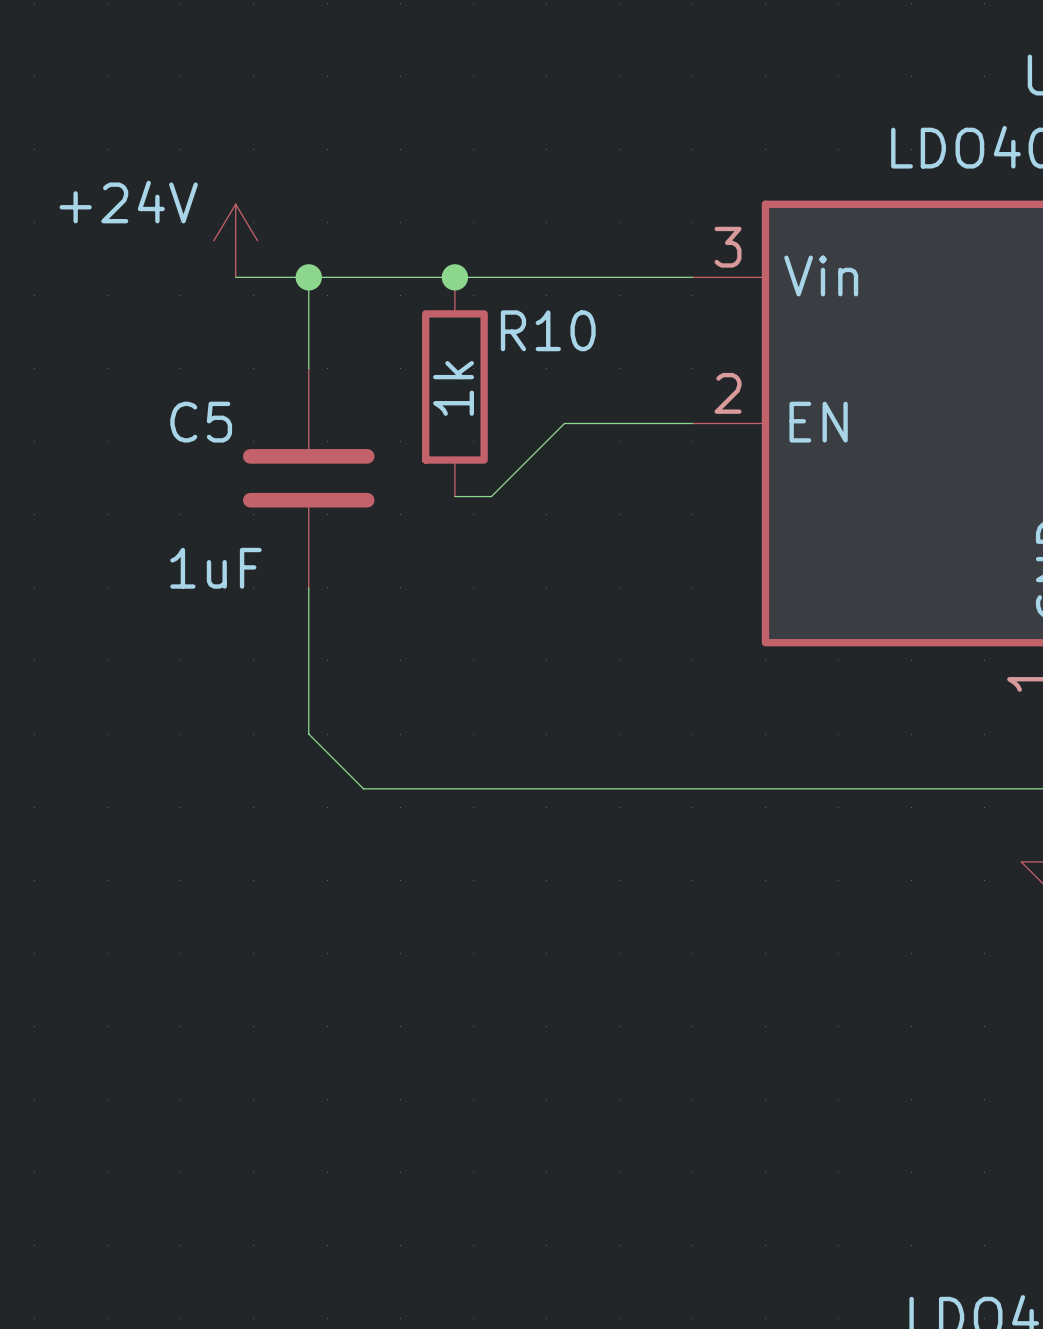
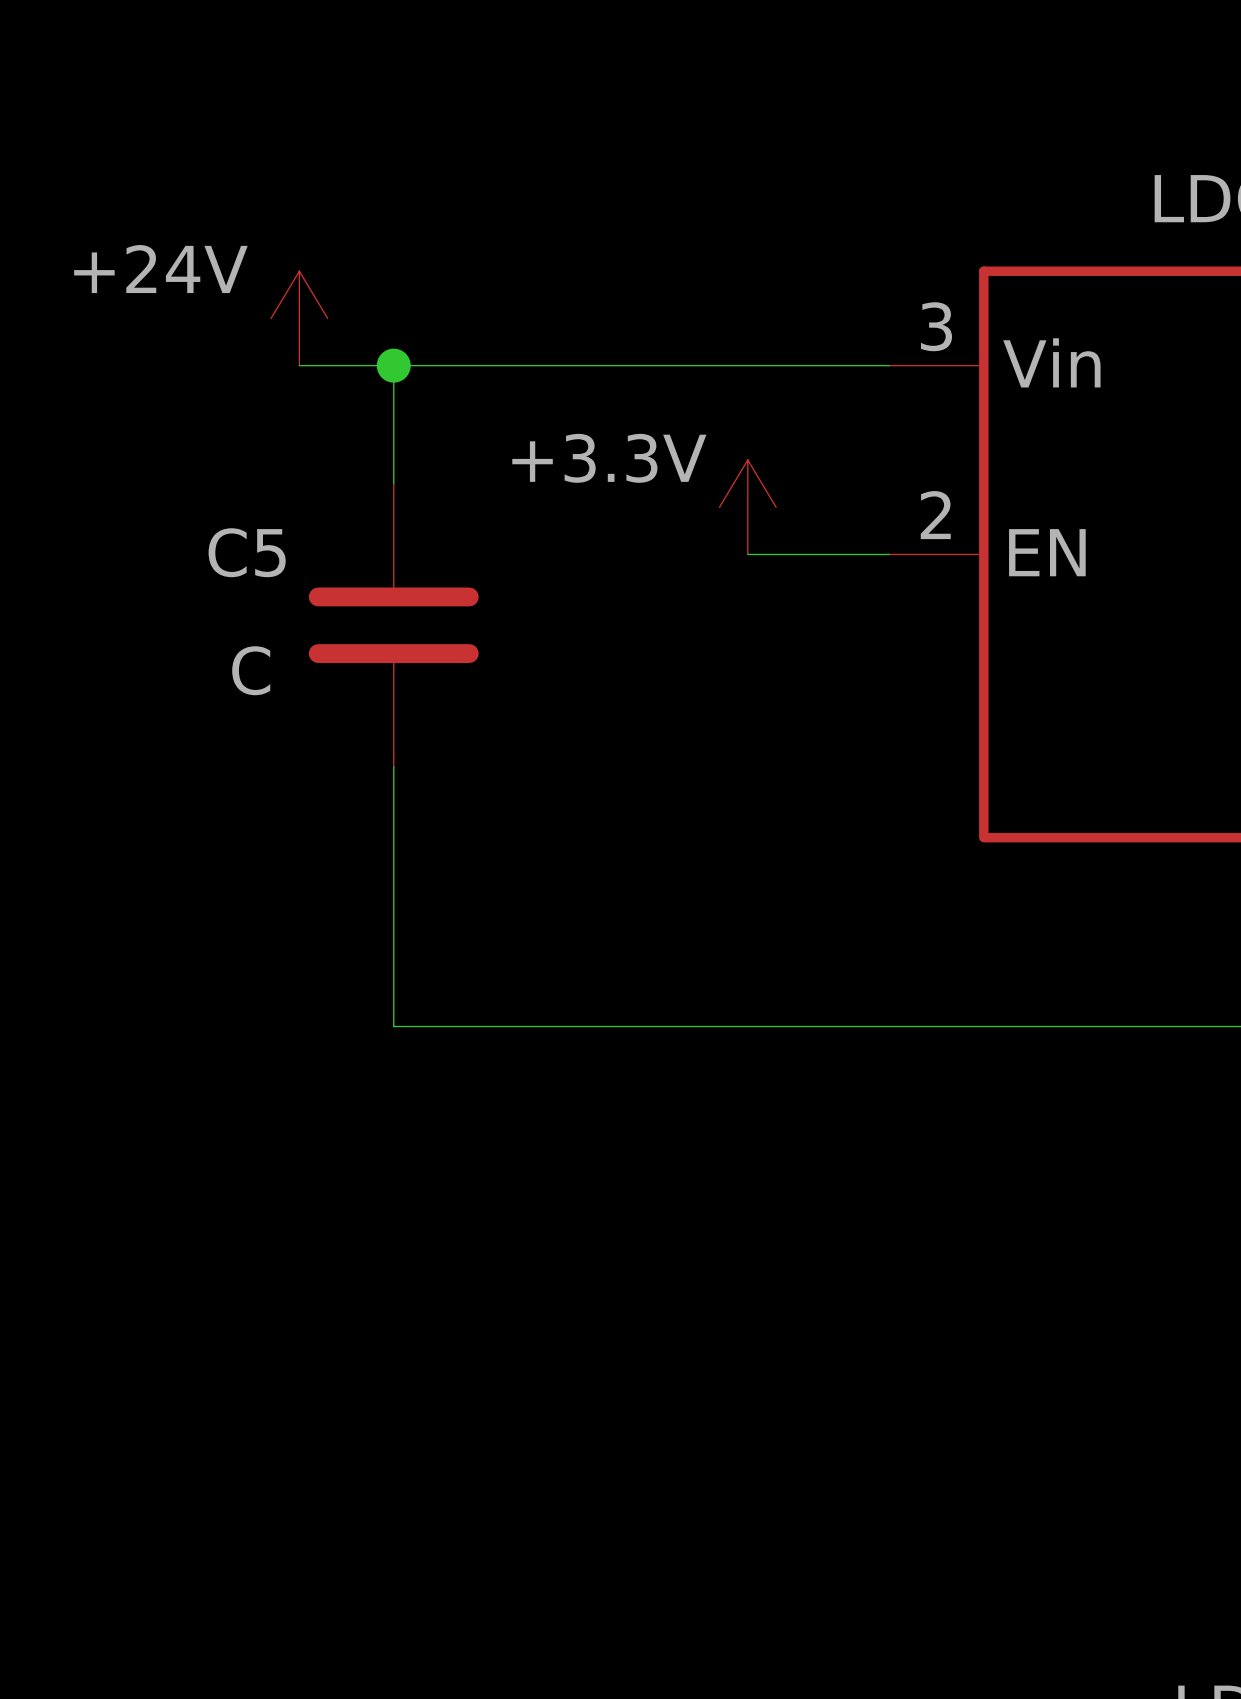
junction: (454, 277) -> none
R10: 1k (454, 386) -> none
power symbol: none -> +3.3V (747, 507)
wire: (582, 423) (564, 423) (491, 496) (454, 496) -> none
C5 value: 1uF (215, 568) -> C (251, 670)
wire: (308, 734) (363, 788) -> (393, 955) (393, 1026) (464, 1026)

